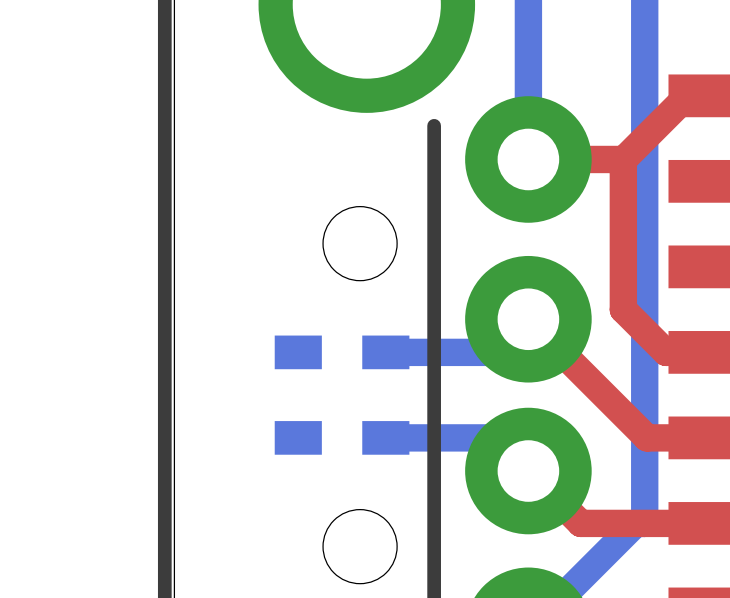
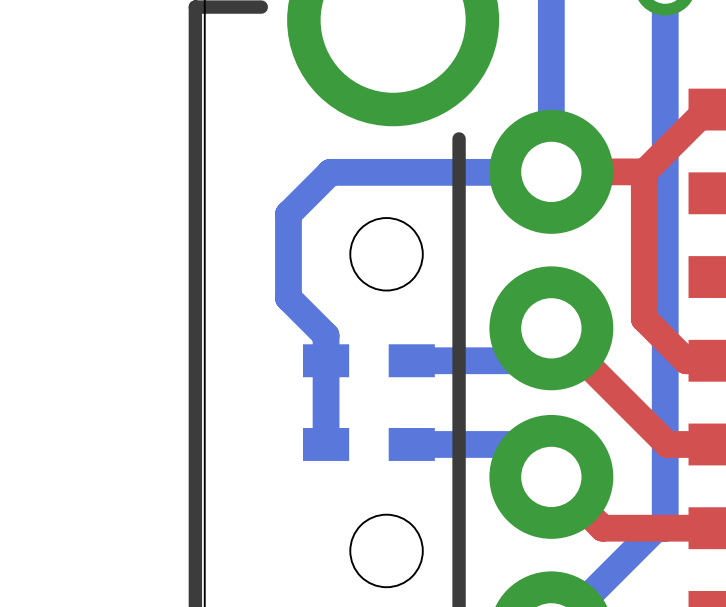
bottom track: none -> (550, 172) (330, 172) (288, 214) (288, 297) (326, 335) (326, 444)

